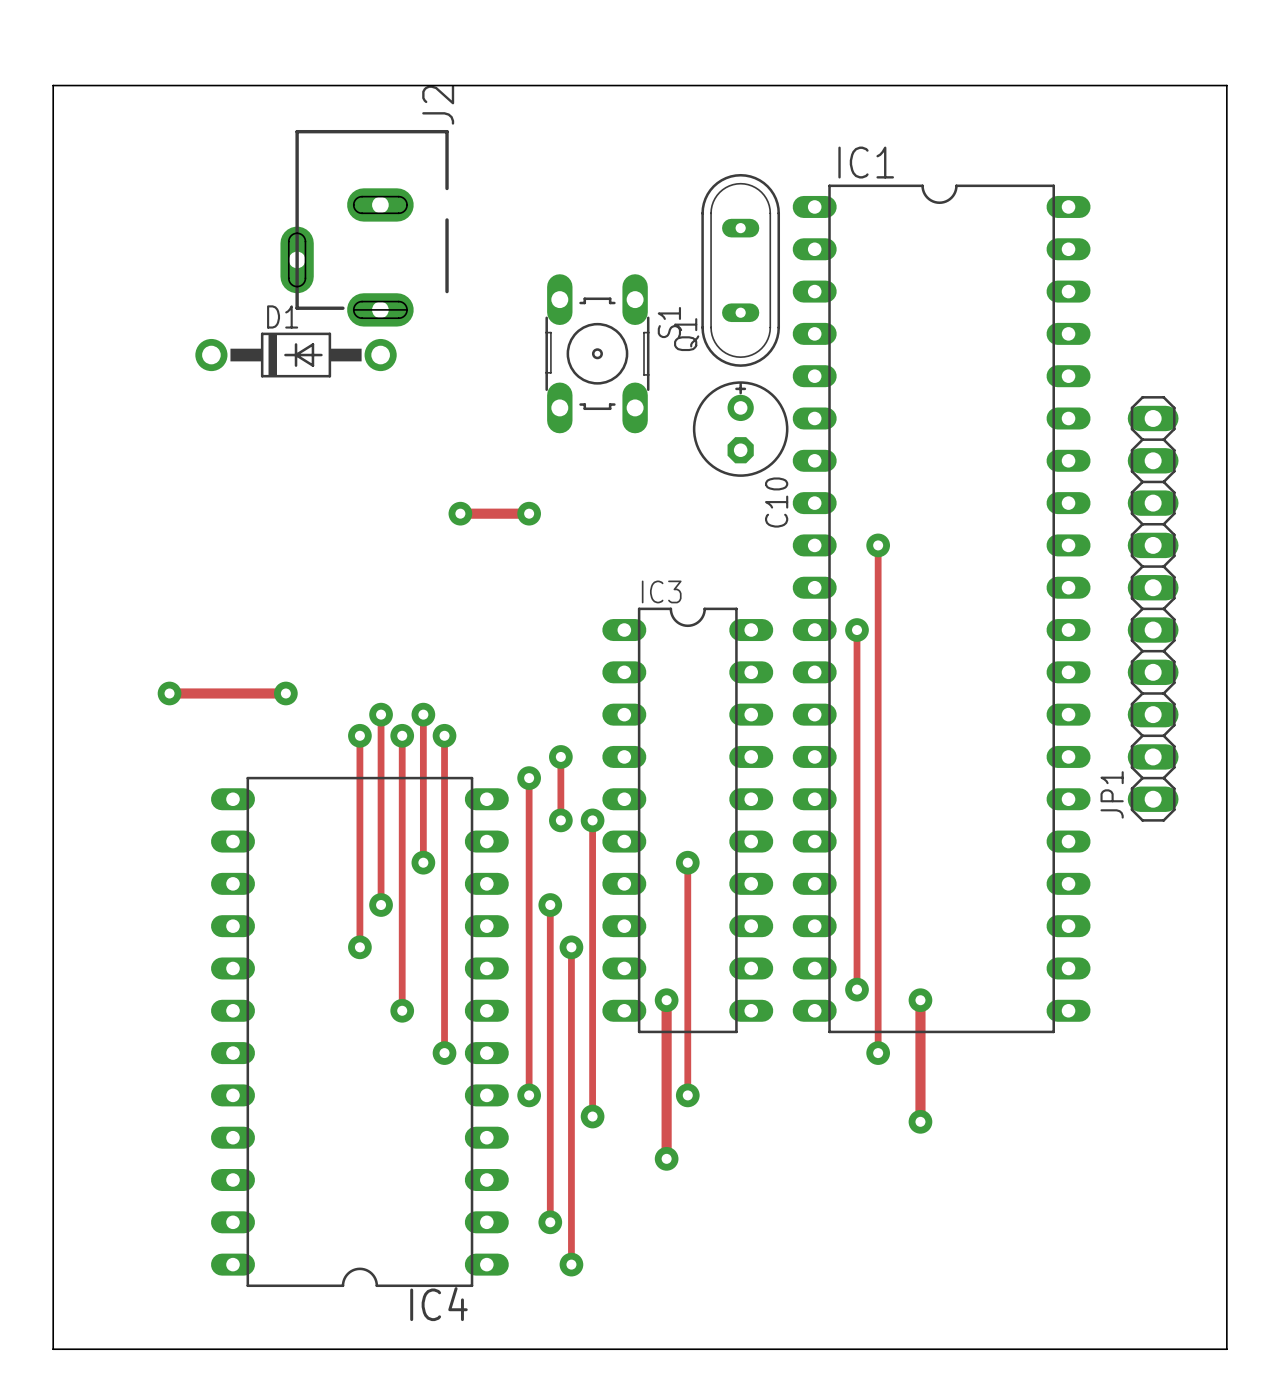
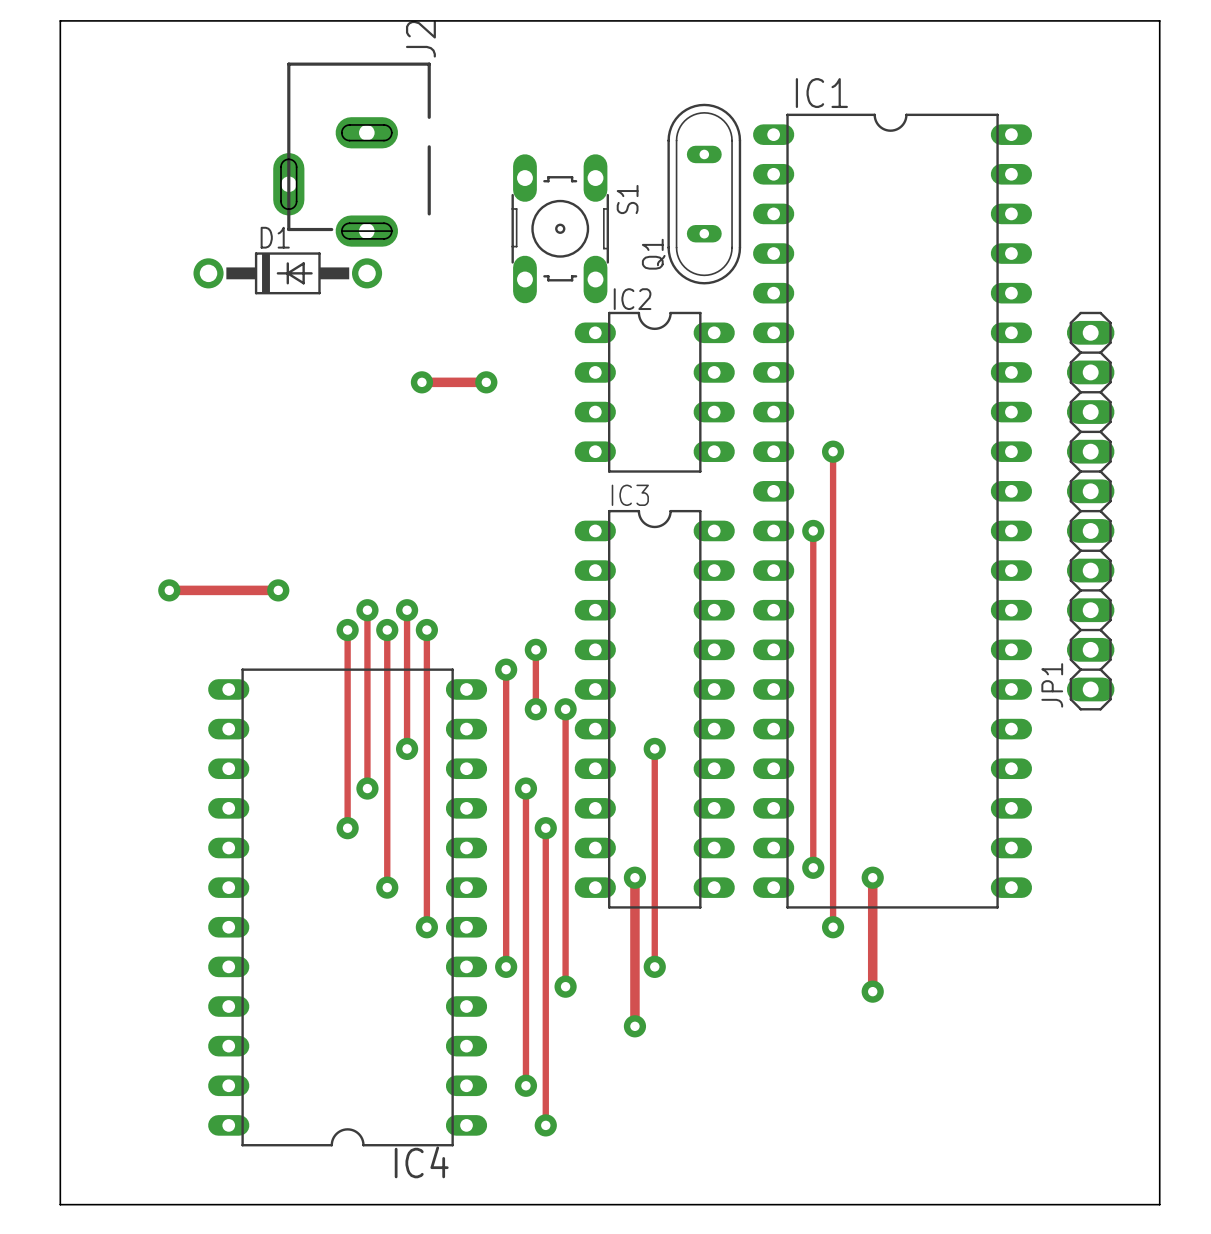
S1 position: (597, 353) -> (560, 228)
C10: (740, 429) -> none
via: none -> (421, 382)
via: none -> (486, 382)
IC2: none -> (654, 392)
track: (460, 513) (529, 513) -> (421, 382) (486, 382)
via: (460, 513) -> none
via: (529, 513) -> none

